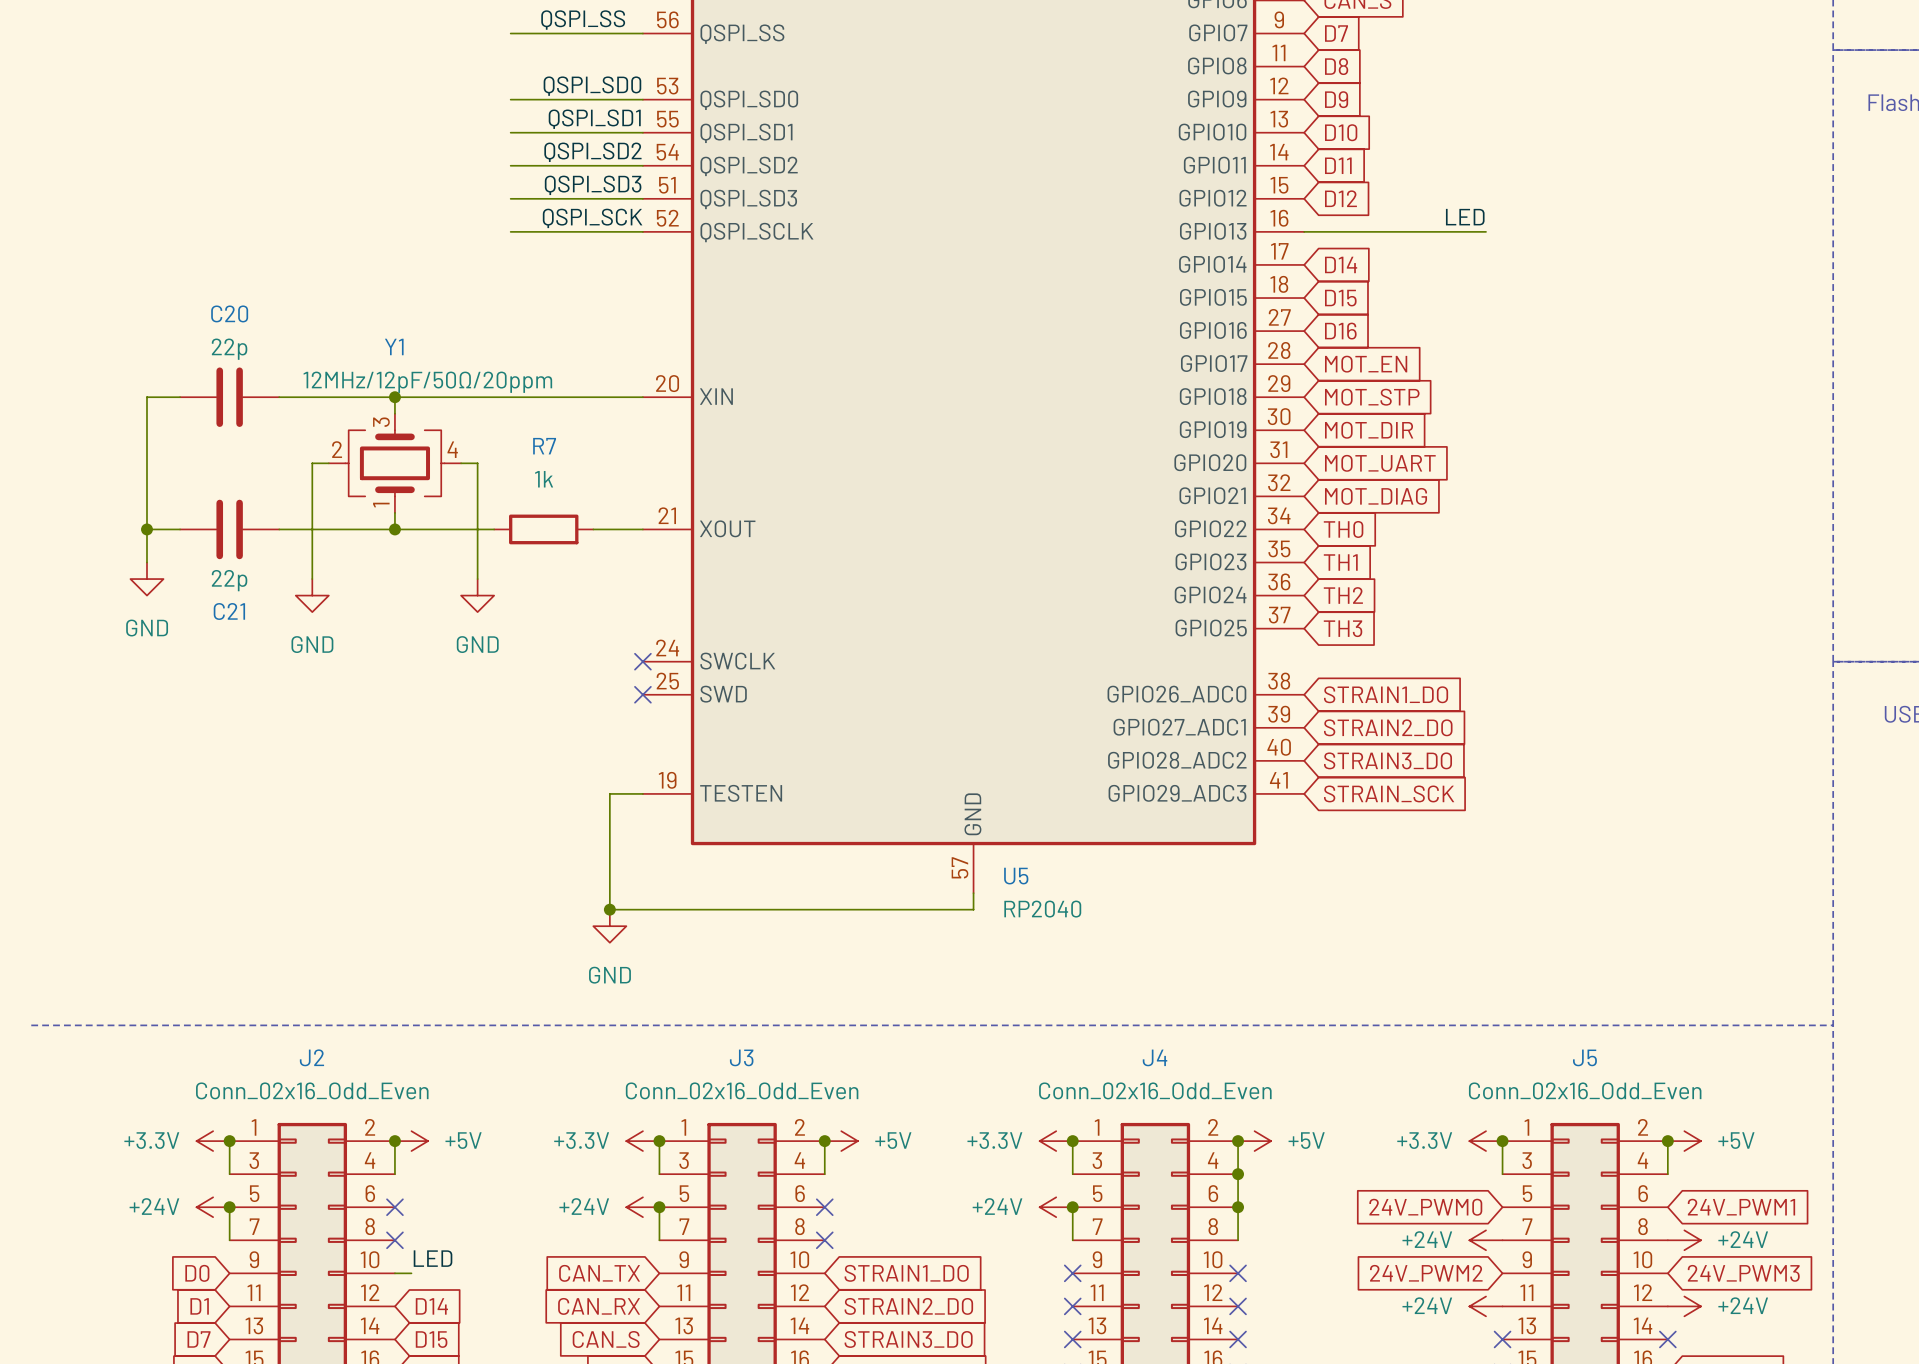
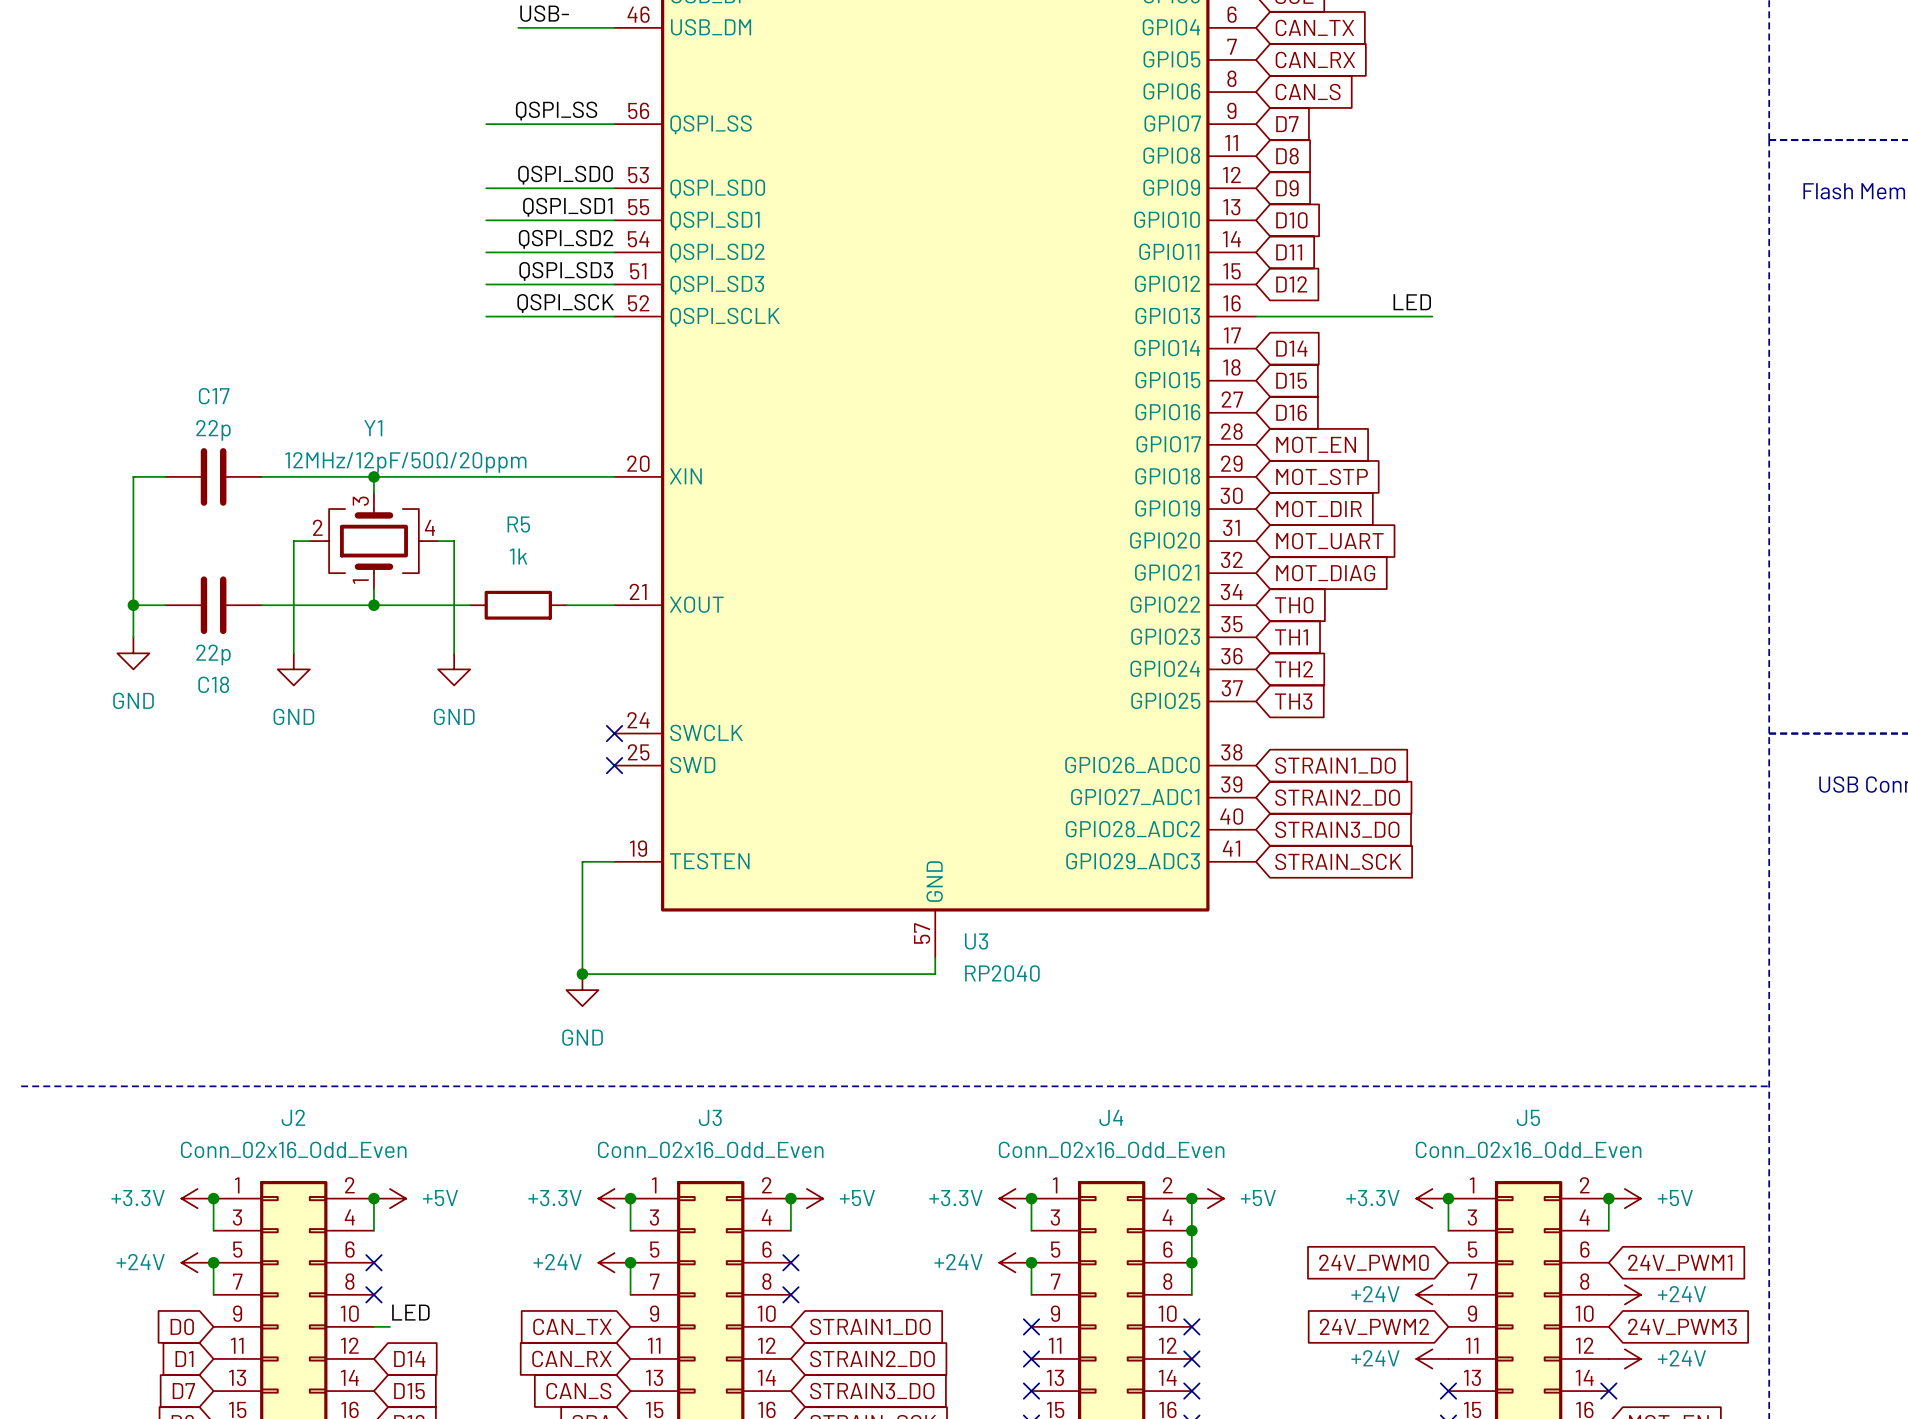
C20 name: C20 (229, 313) -> C17 (214, 396)
R7 name: R7 (544, 446) -> R5 (518, 524)
C21 name: C21 (229, 611) -> C18 (213, 684)
U5 name: U5 (1016, 876) -> U3 (976, 941)

